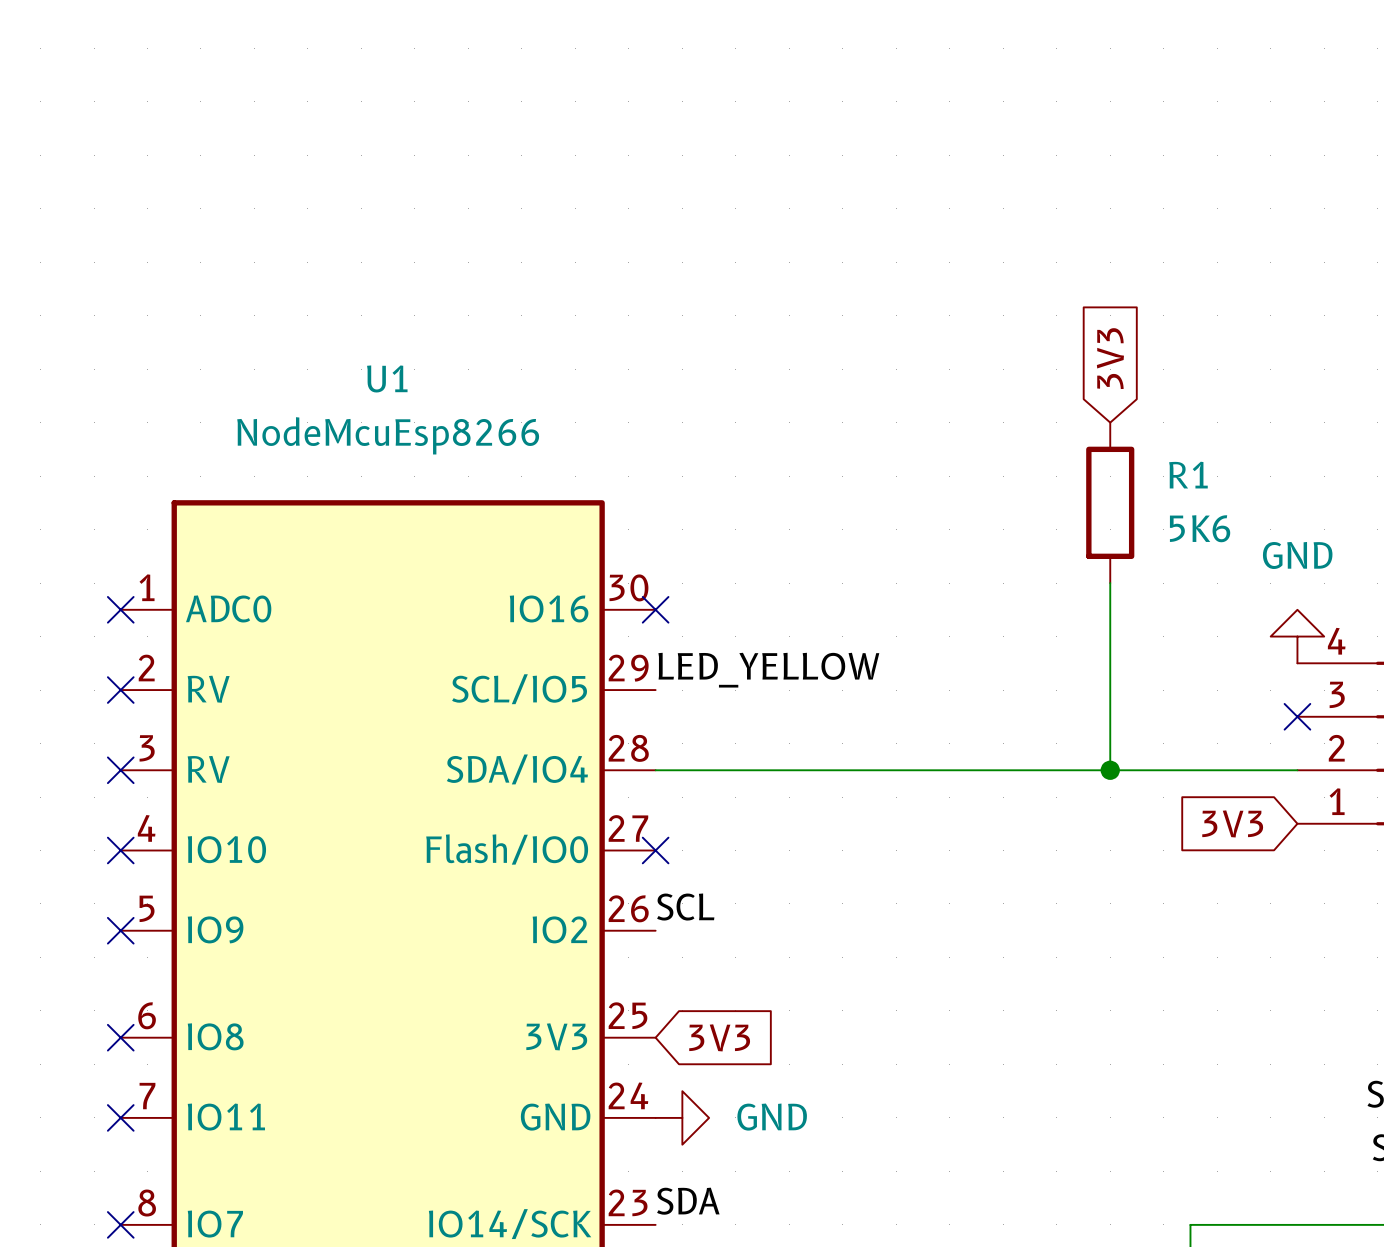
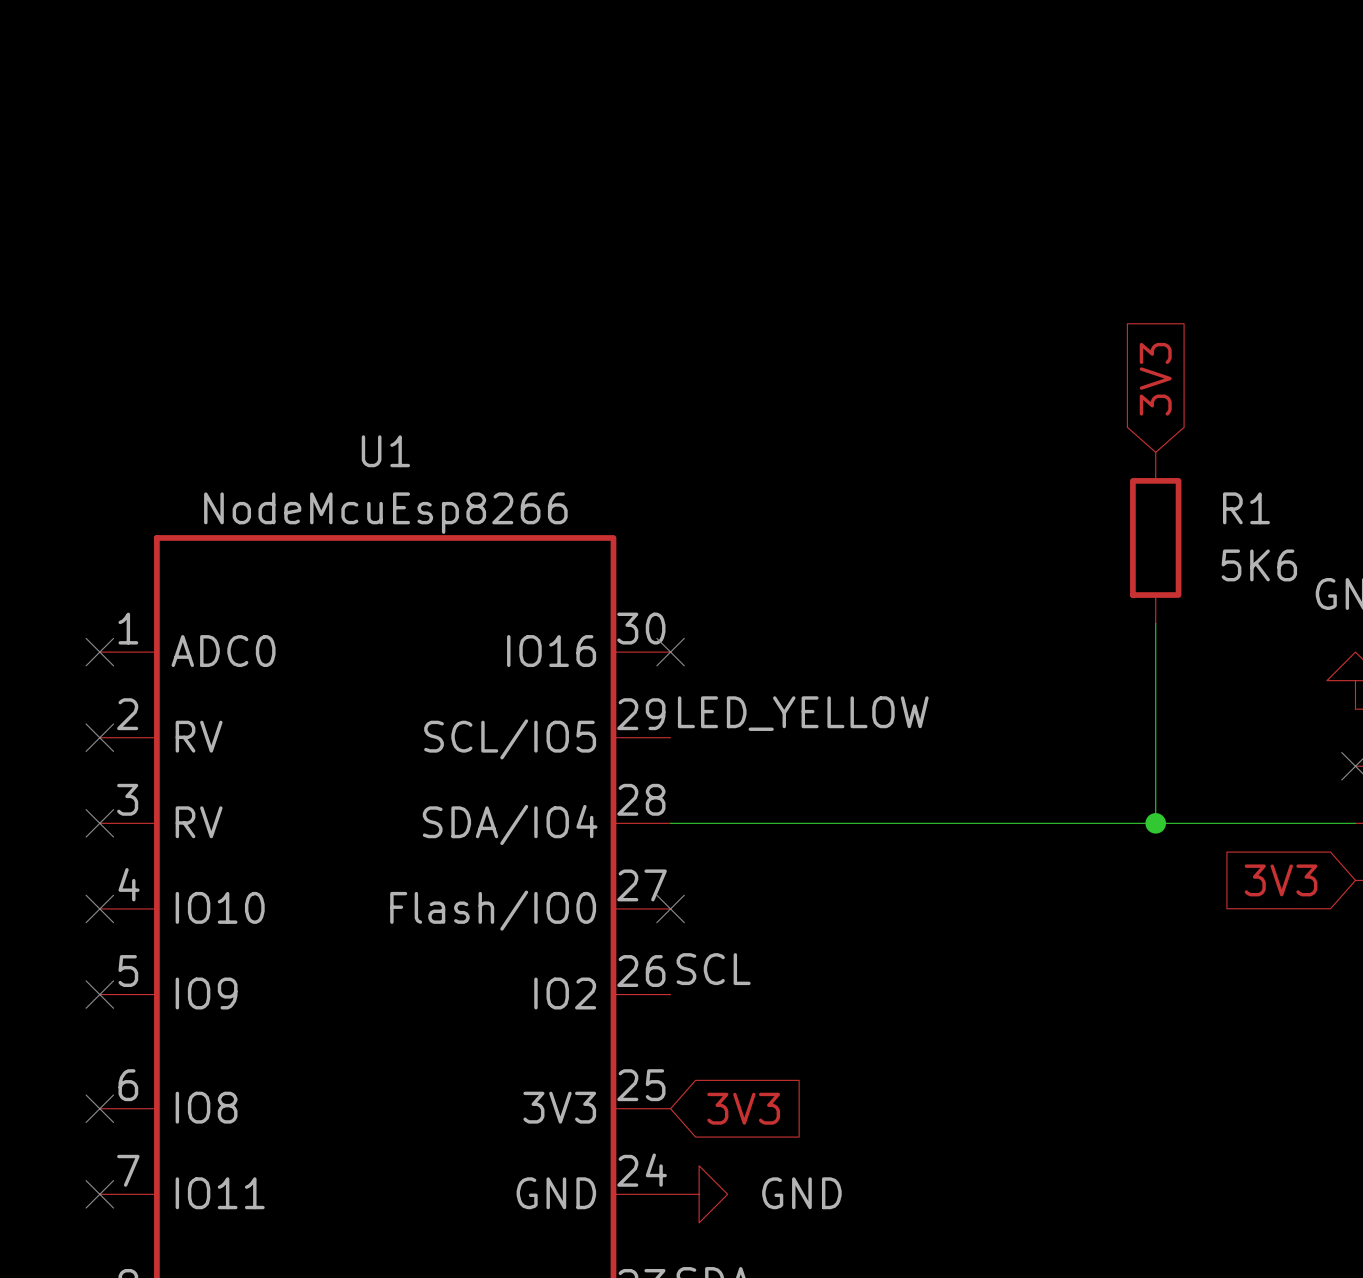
U1 name position: U1 (387, 378) -> U1 (385, 451)
U1 value position: NodeMcuEsp8266 (388, 435) -> NodeMcuEsp8266 (385, 513)

